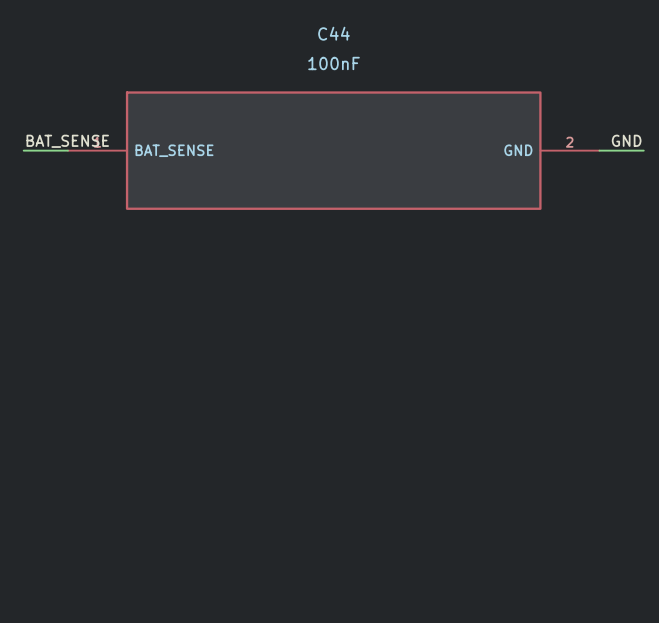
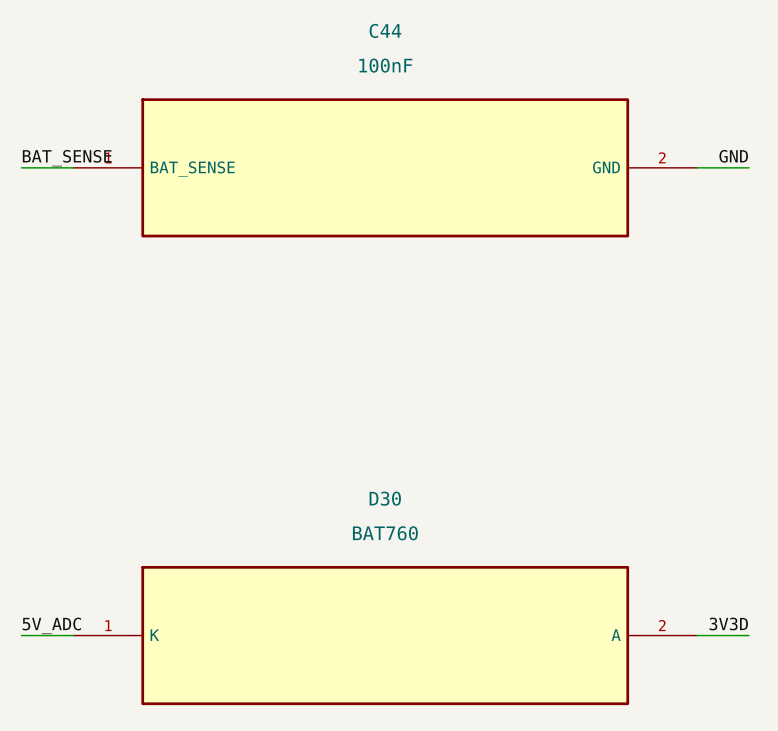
label: none -> 5V_ADC (51, 625)
label: none -> 3V3D (728, 624)
wire: none -> (21, 635) (73, 635)
D30: none -> BAT760 (385, 635)
wire: none -> (697, 635) (749, 635)

